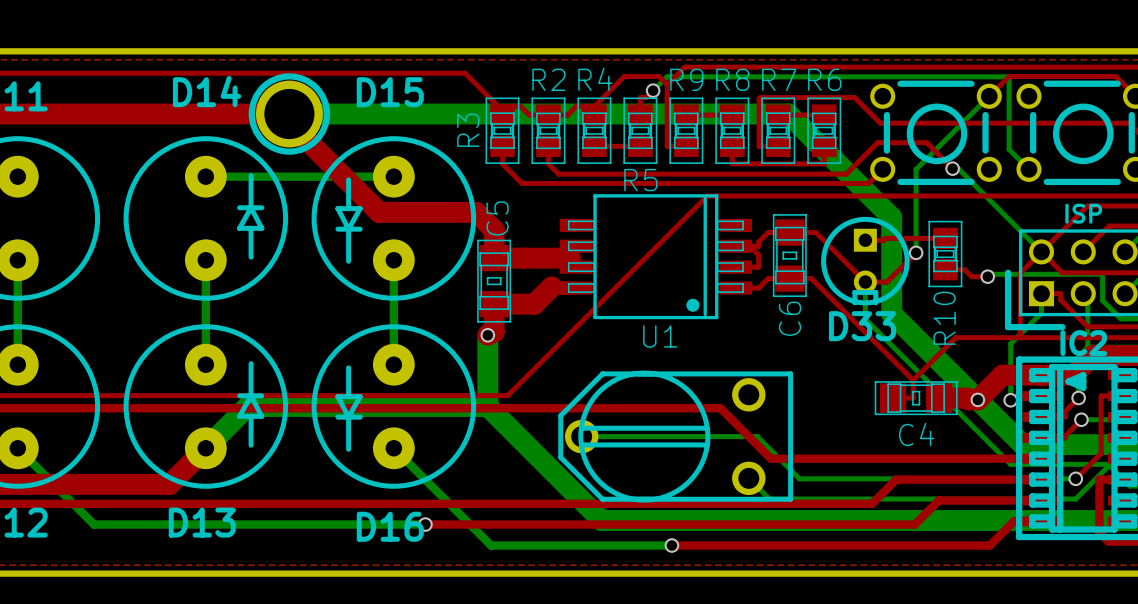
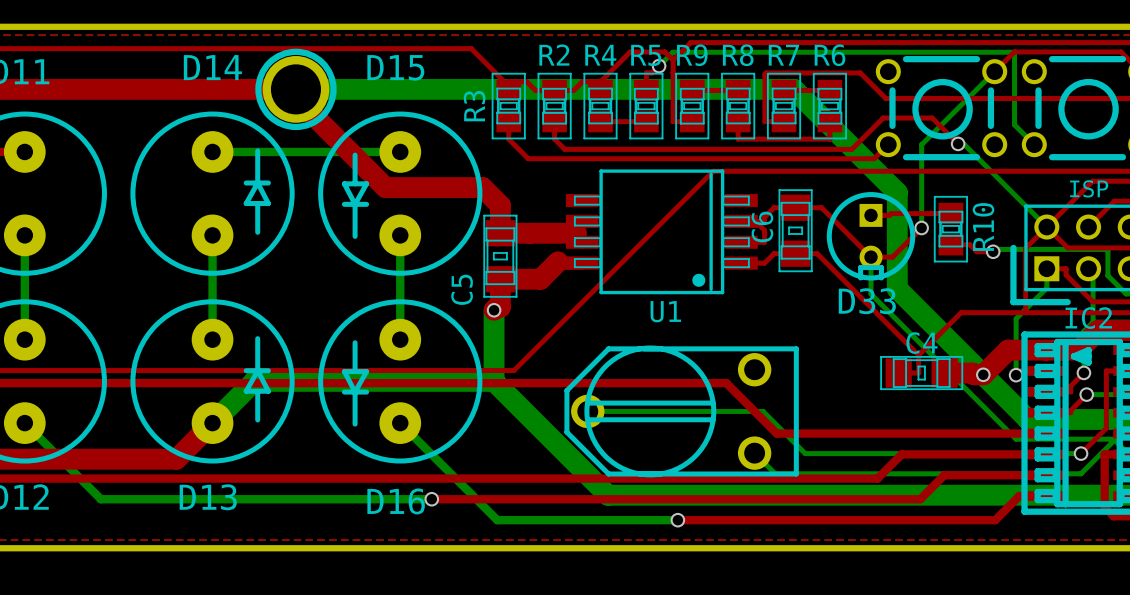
R5 name position: R5 (640, 180) -> R5 (646, 55)
C5 name position: C5 (497, 218) -> C5 (462, 289)
C6 name position: C6 (790, 318) -> C6 (762, 227)
R10 name position: R10 (944, 318) -> R10 (983, 226)
C4 name position: C4 (916, 434) -> C4 (921, 343)

